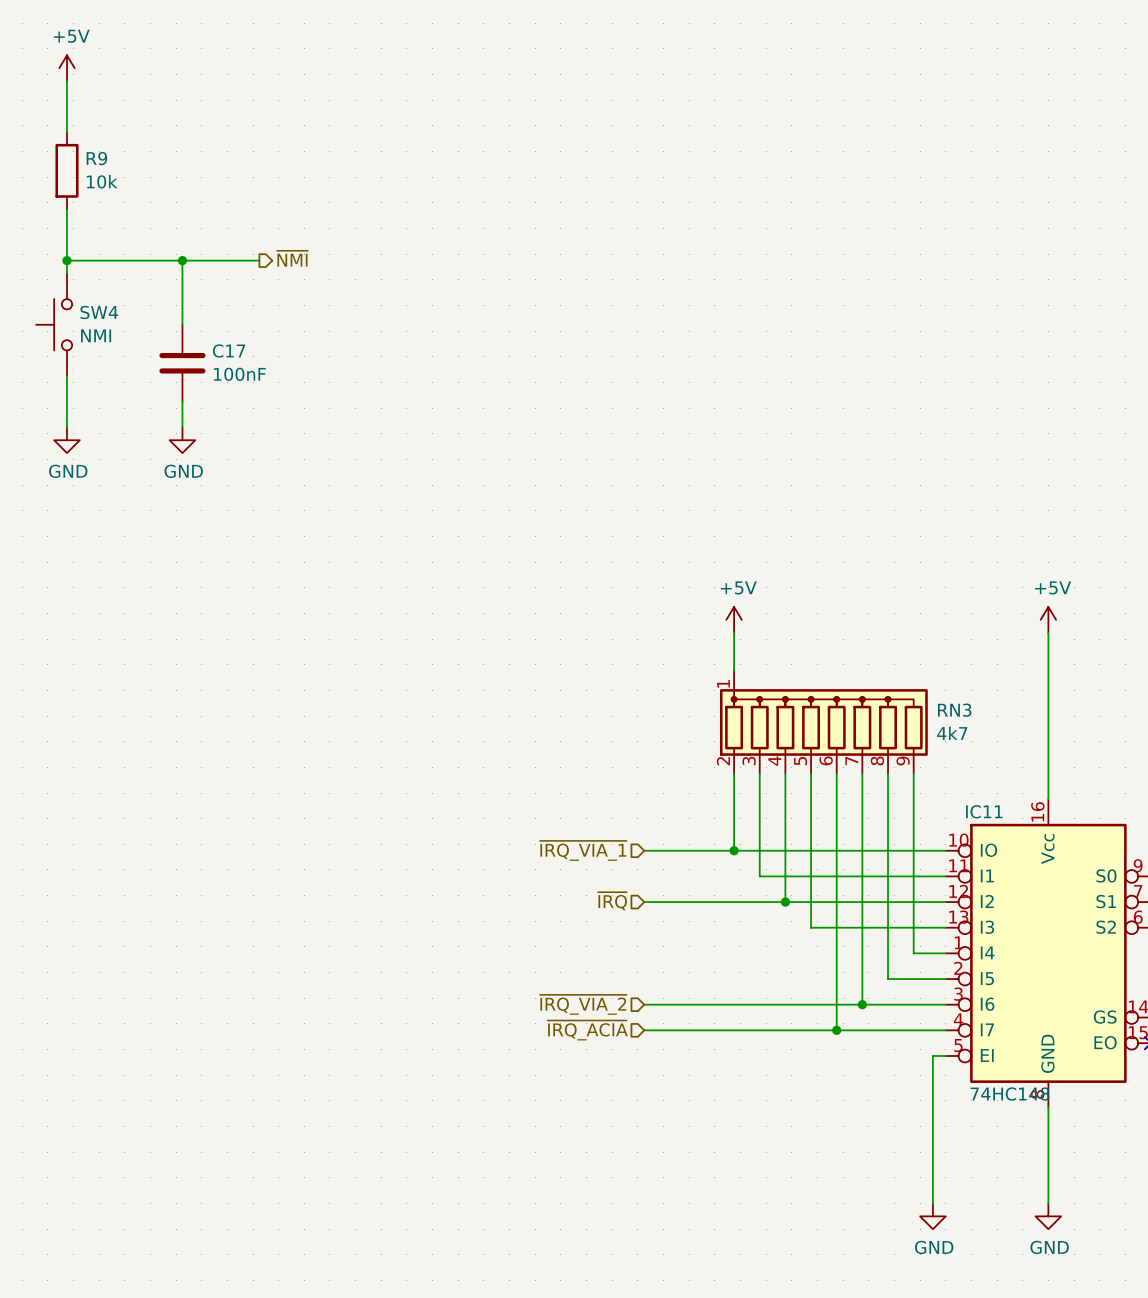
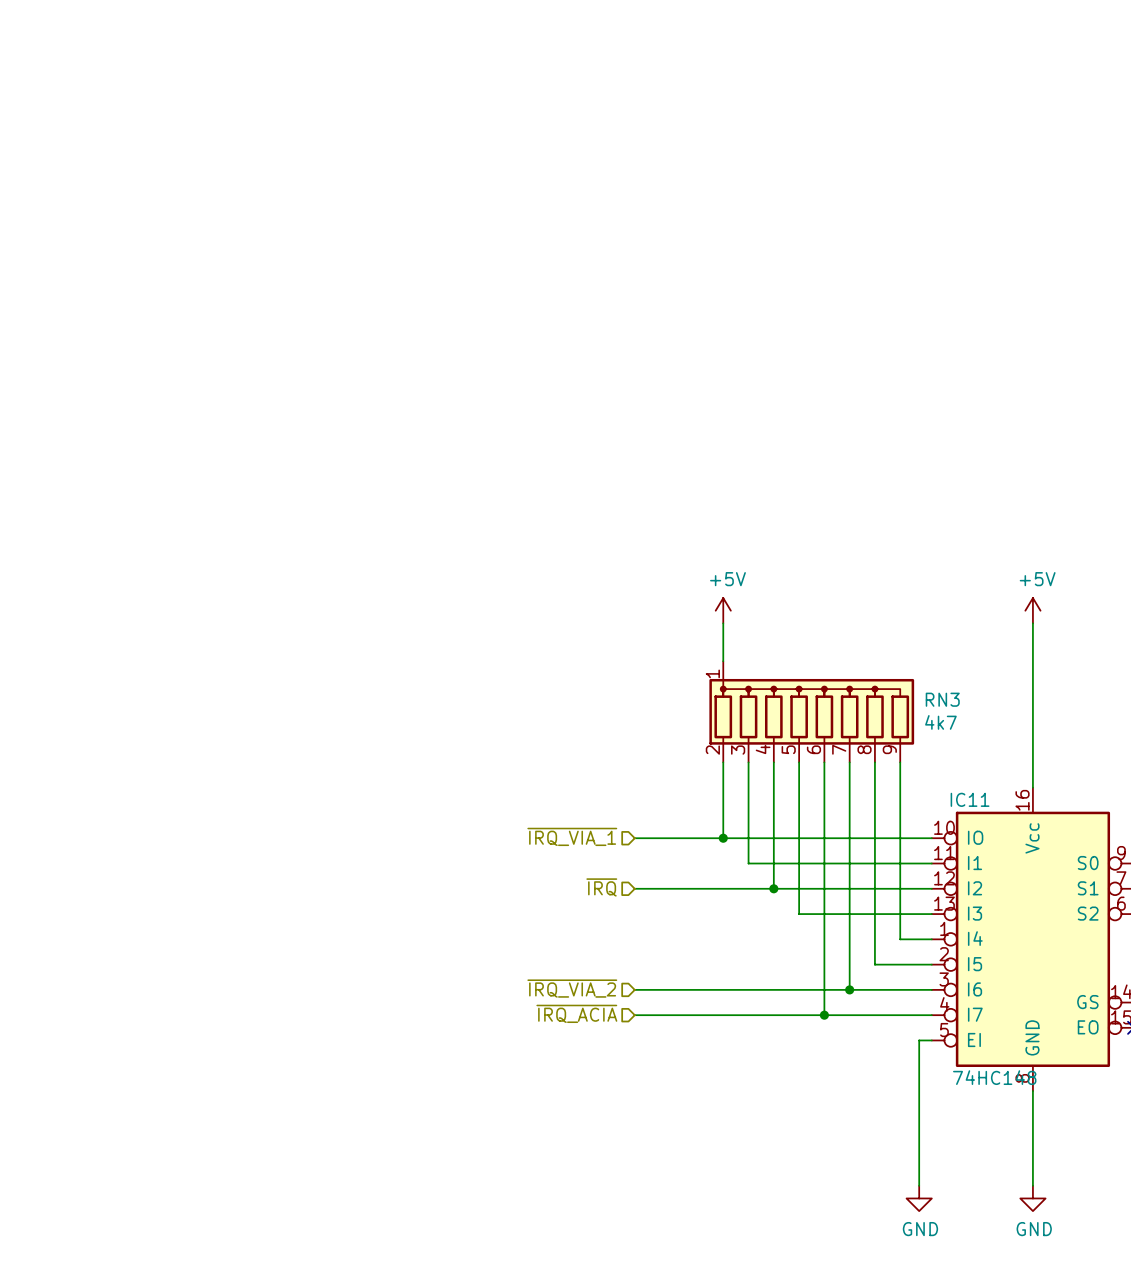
power symbol: +5V (66, 68) -> none
wire: (66, 81) (66, 132) -> none
R9: 10k (66, 170) -> none
wire: (66, 209) (66, 273) -> none
hierarchical label: ~{NMI} (292, 258) -> none
wire: (66, 260) (259, 260) -> none
junction: (66, 260) -> none
wire: (182, 260) (182, 324) -> none
junction: (182, 260) -> none
SW4: NMI (54, 324) -> none
C17: 100nF (182, 363) -> none
wire: (66, 376) (66, 427) -> none
wire: (182, 401) (182, 427) -> none
power symbol: GND (66, 440) -> none
power symbol: GND (182, 440) -> none

